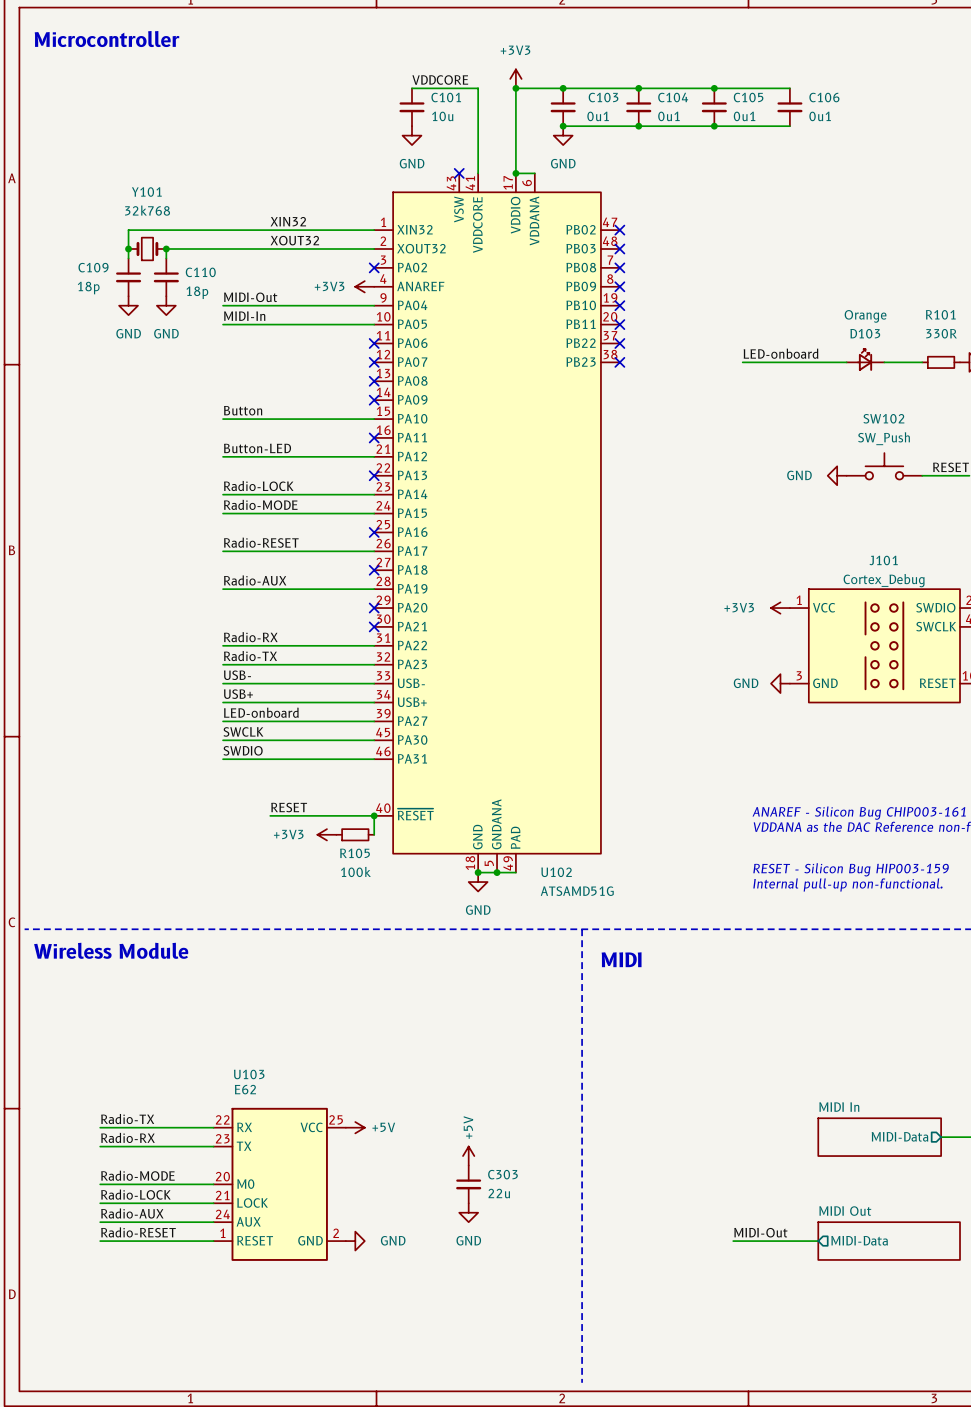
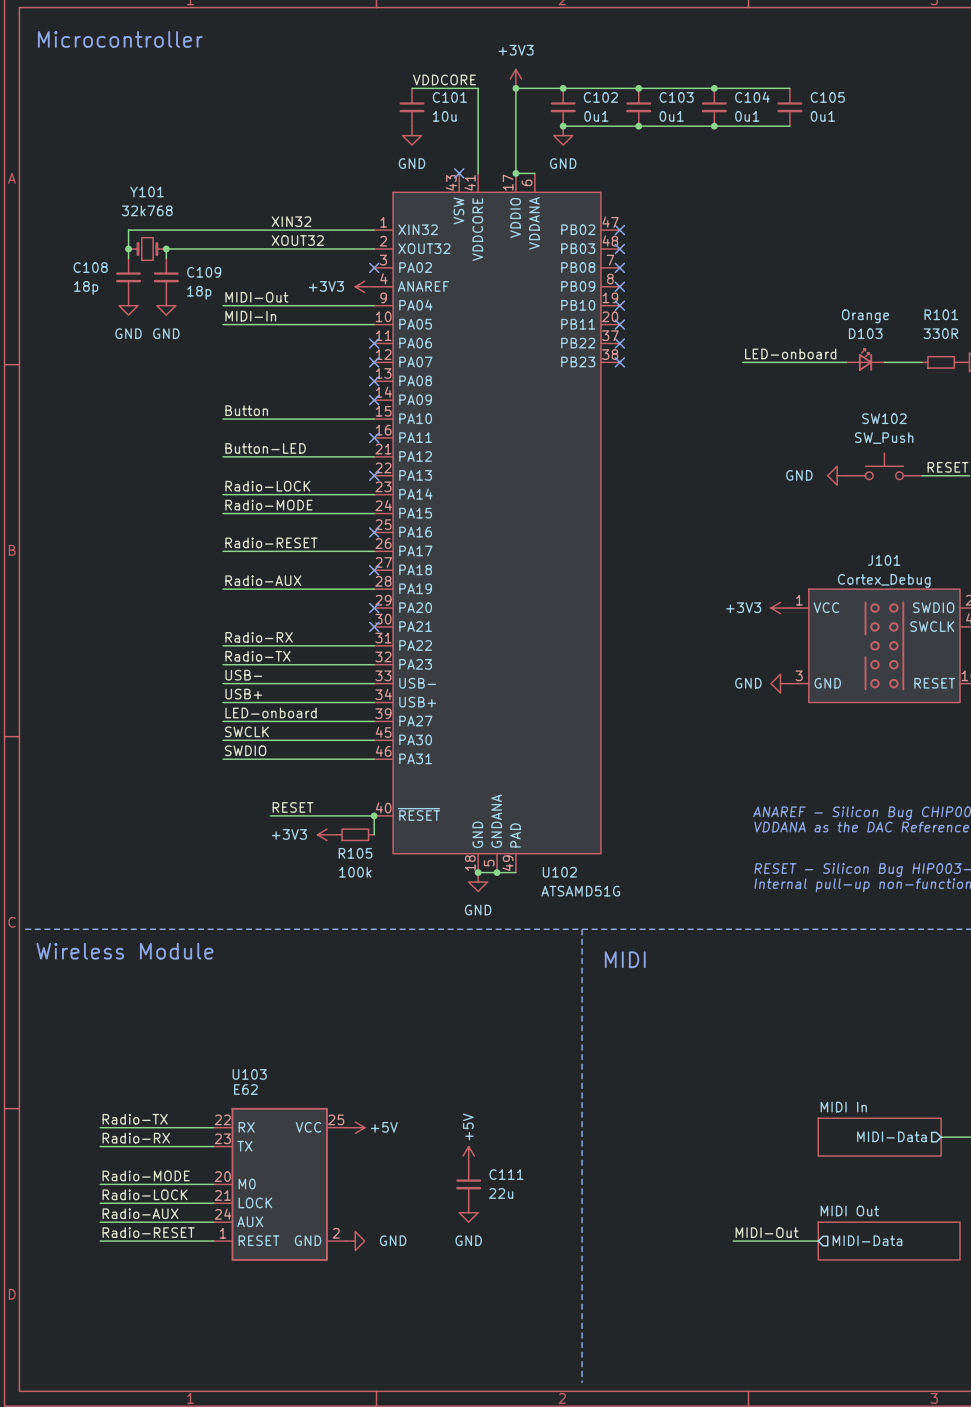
C103 name: C103 (603, 97) -> C102 (600, 97)
C104 name: C104 (673, 97) -> C103 (676, 97)
C105 name: C105 (748, 97) -> C104 (752, 97)
C106 name: C106 (824, 97) -> C105 (827, 97)
C109 name: C109 (93, 267) -> C108 (90, 267)
C110 name: C110 (200, 272) -> C109 (204, 272)
C303 name: C303 (502, 1174) -> C111 (506, 1174)

